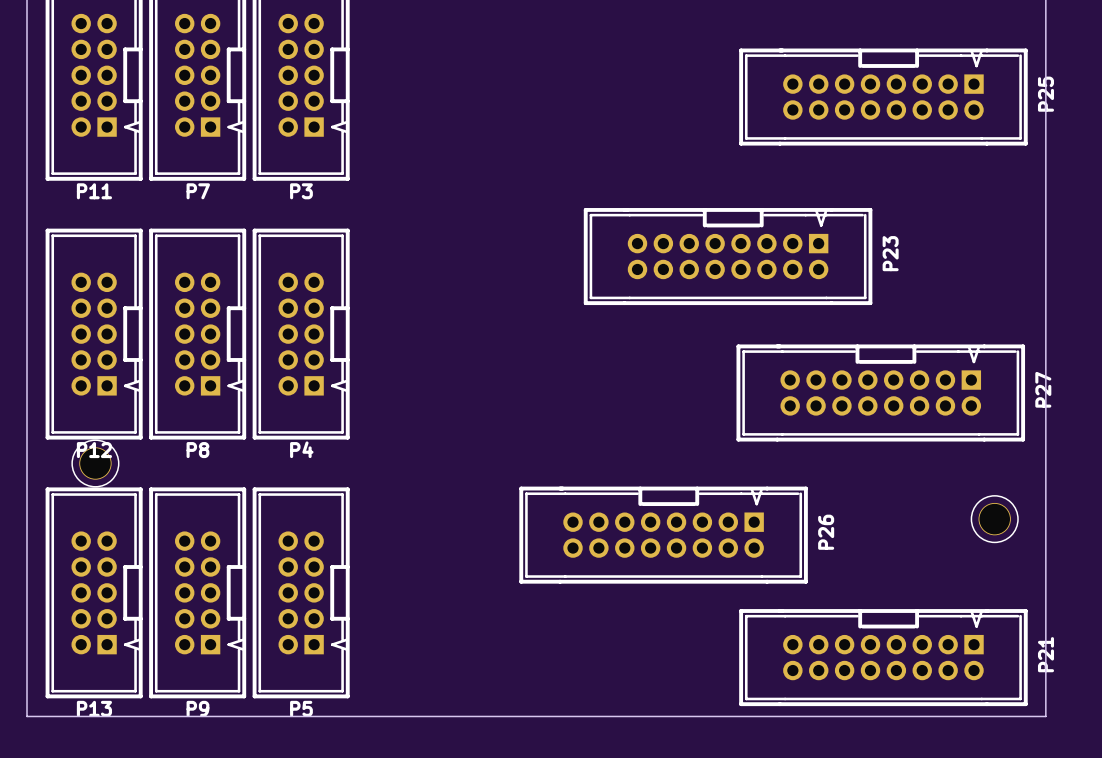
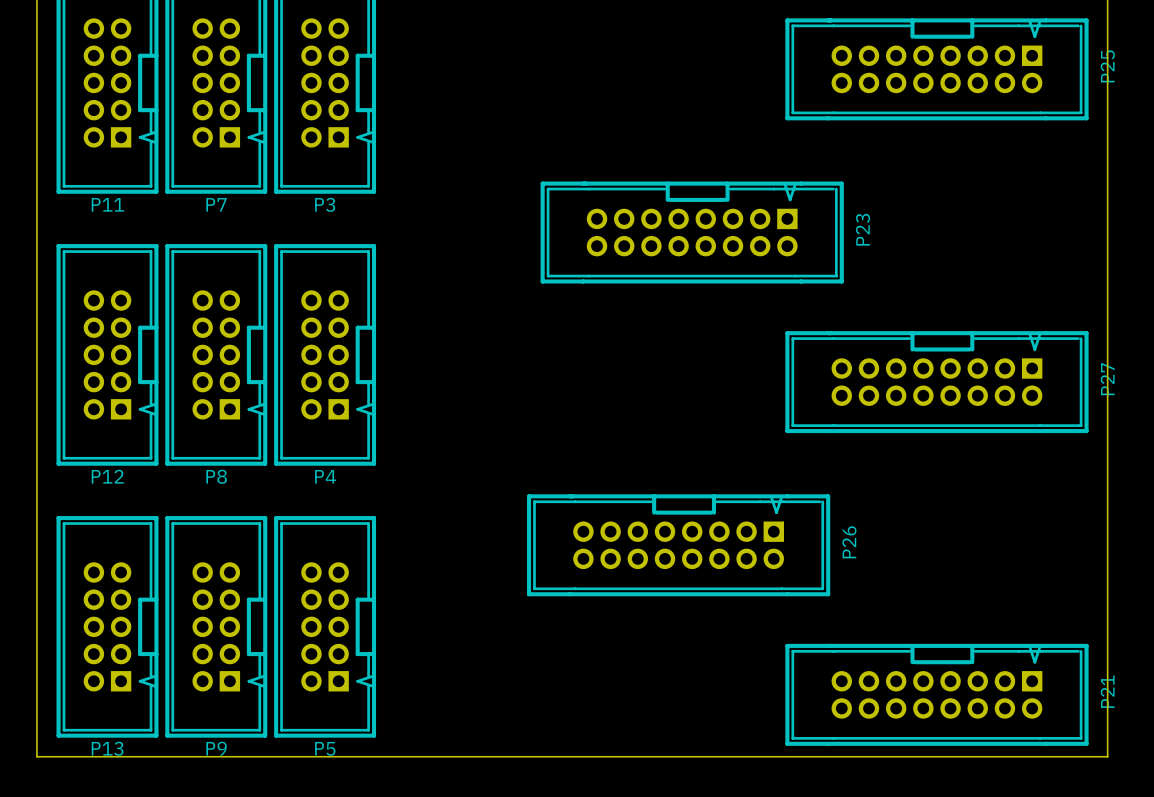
P25 position: (883, 97) -> (936, 69)
P23 position: (728, 256) -> (692, 232)
P27 position: (880, 392) -> (936, 382)
part: (95, 463) -> none
part: (994, 519) -> none
P26 position: (663, 535) -> (678, 545)

